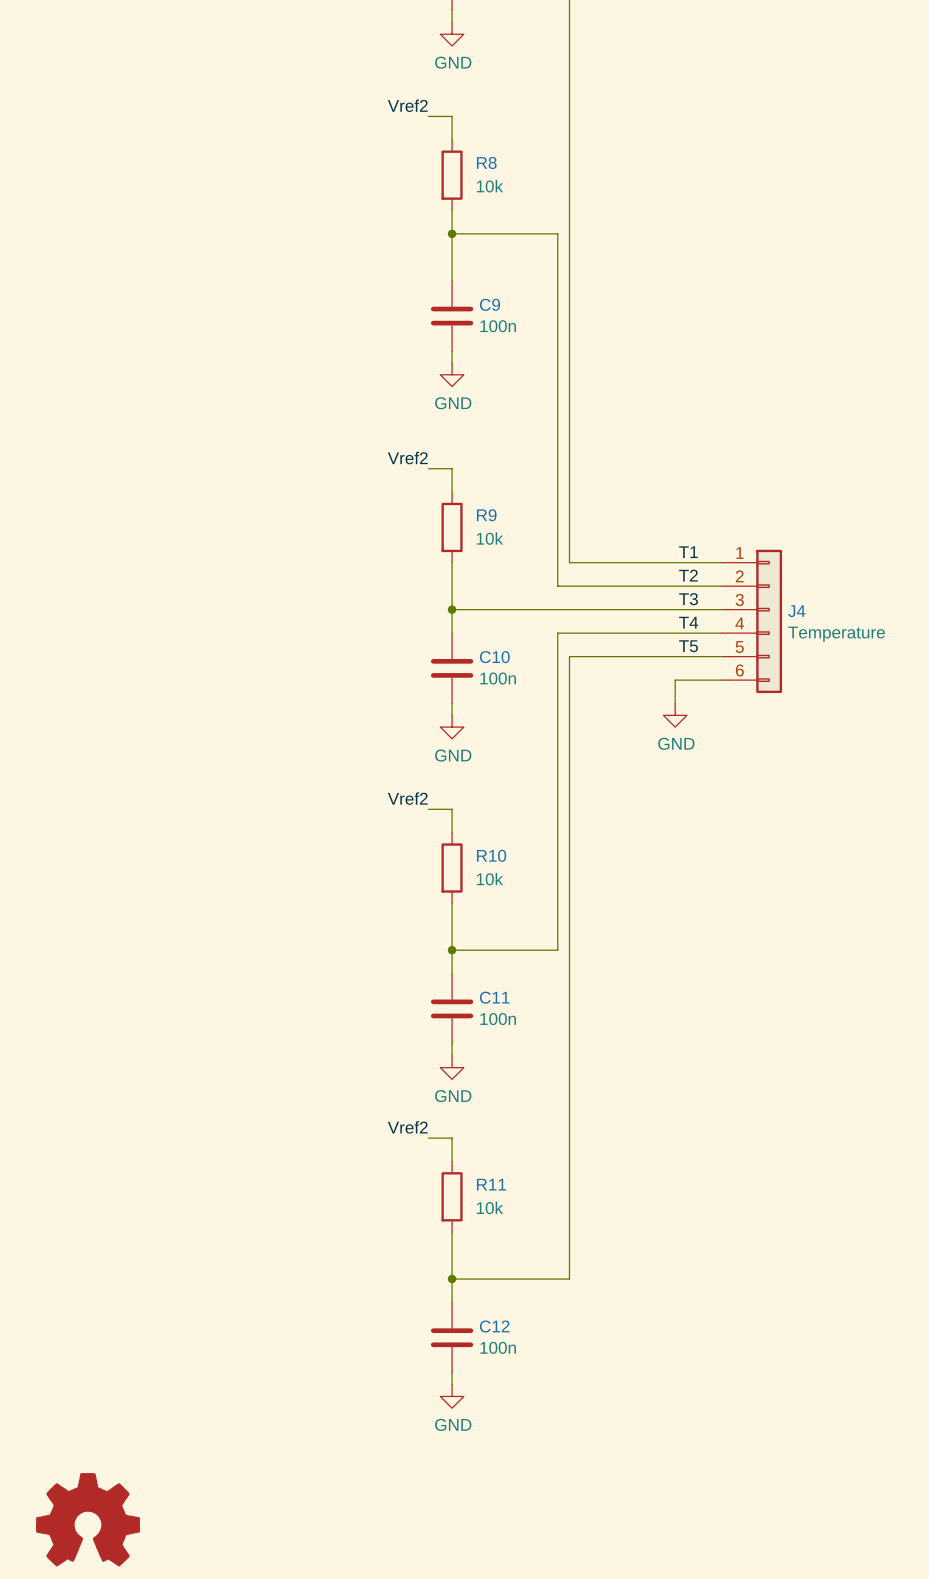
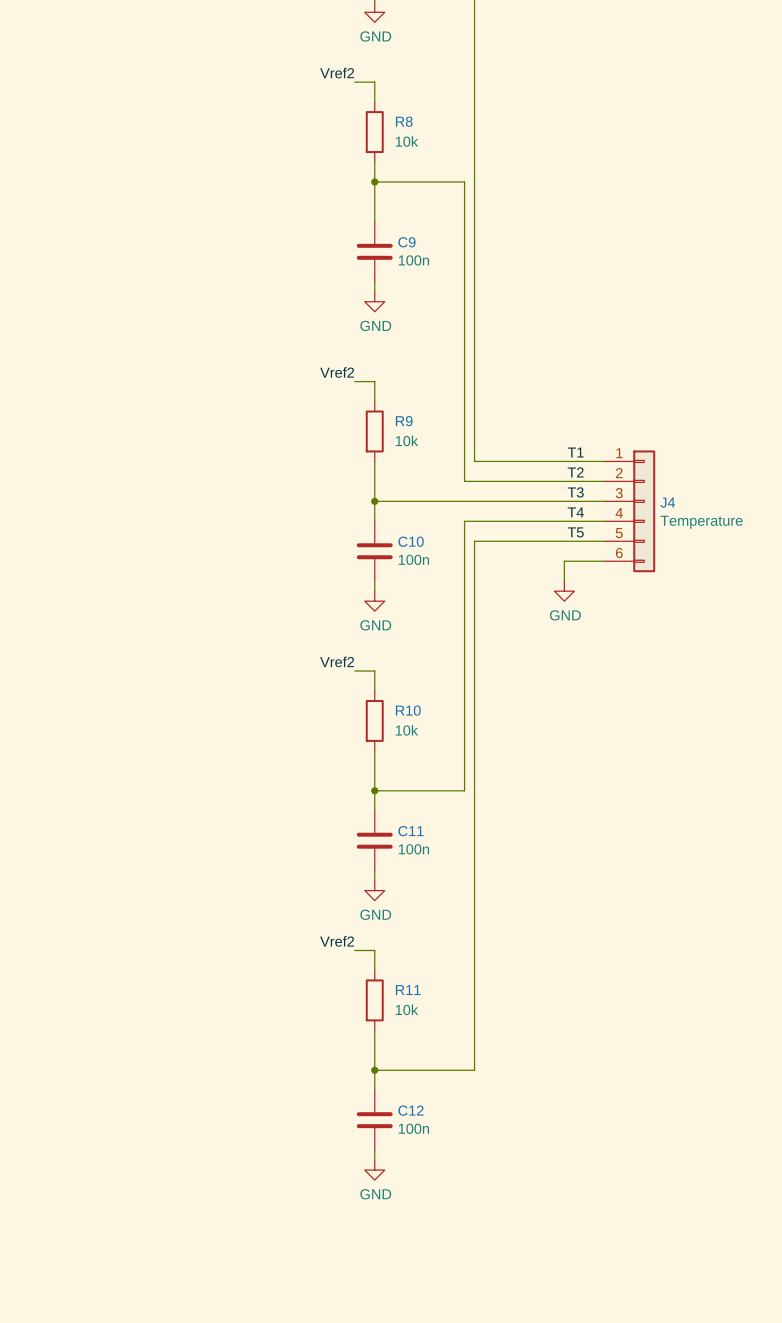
part: (88, 1519) -> none

